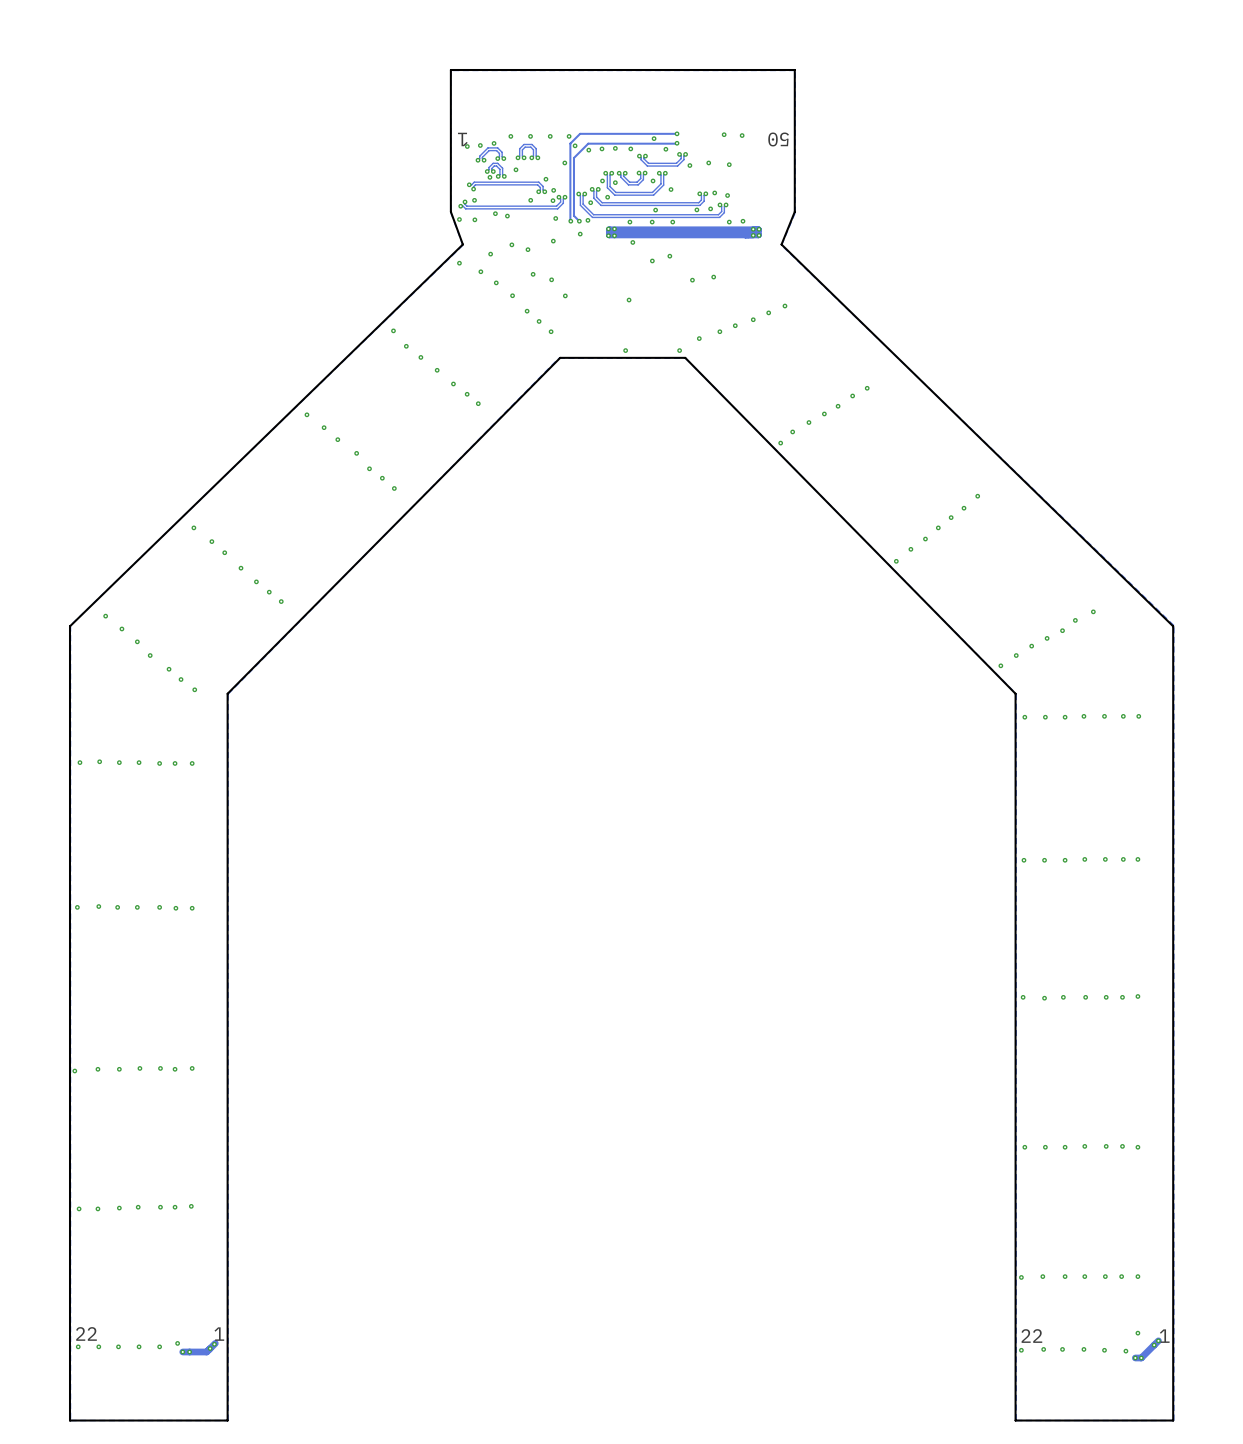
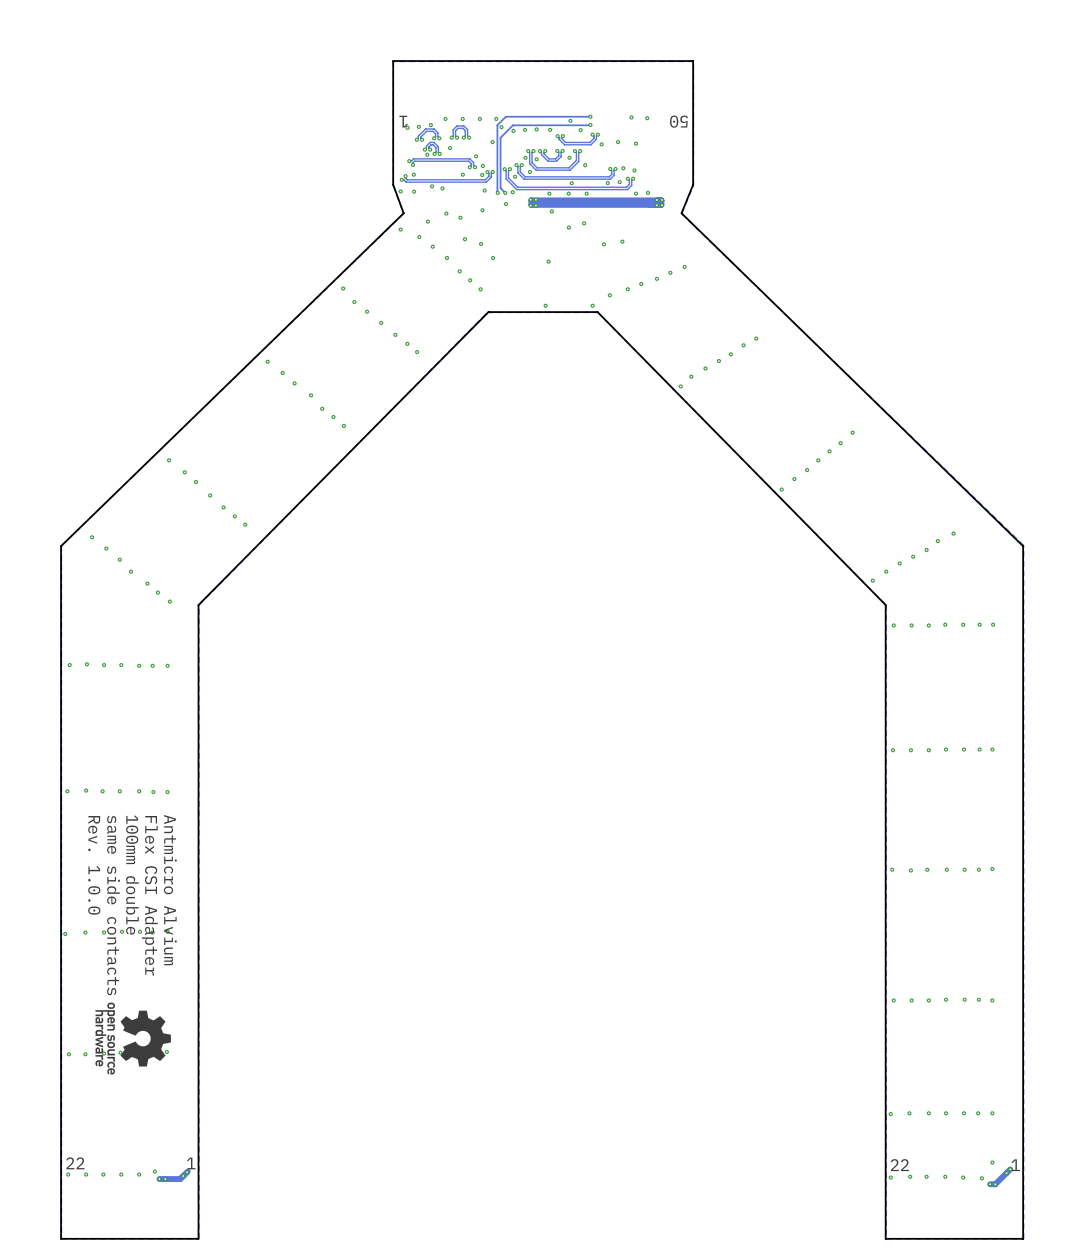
text: none -> Rev. 1.0.0 (94, 865)
text: none -> 100mm double (132, 875)
text: none -> Antmicro Alvium (170, 890)
text: none -> Flex CSI Adapter (149, 895)
text: none -> same side contacts (113, 905)
drawing: none -> [95, 1002, 171, 1075]

